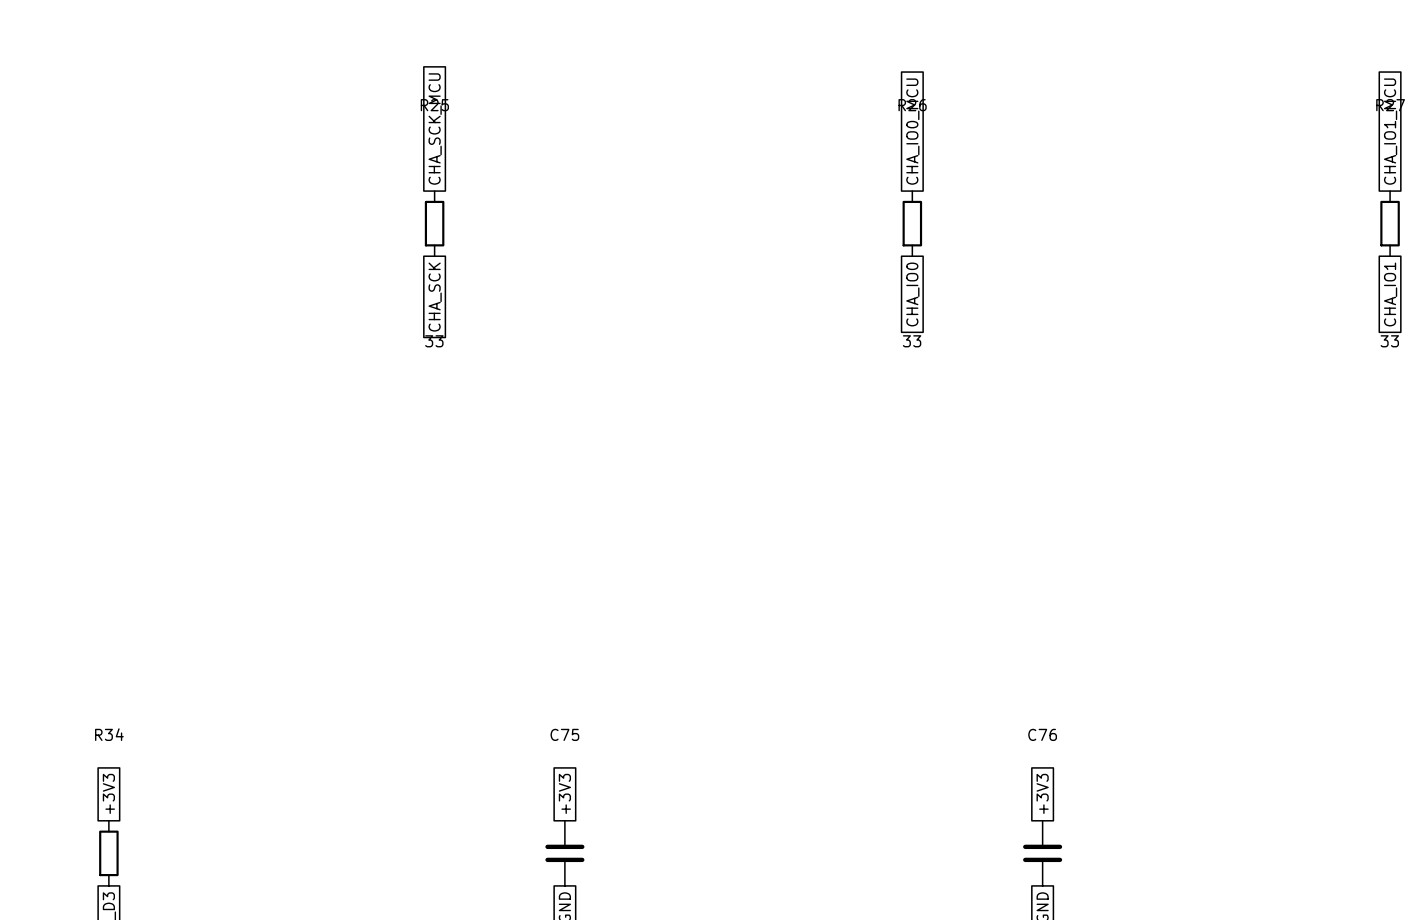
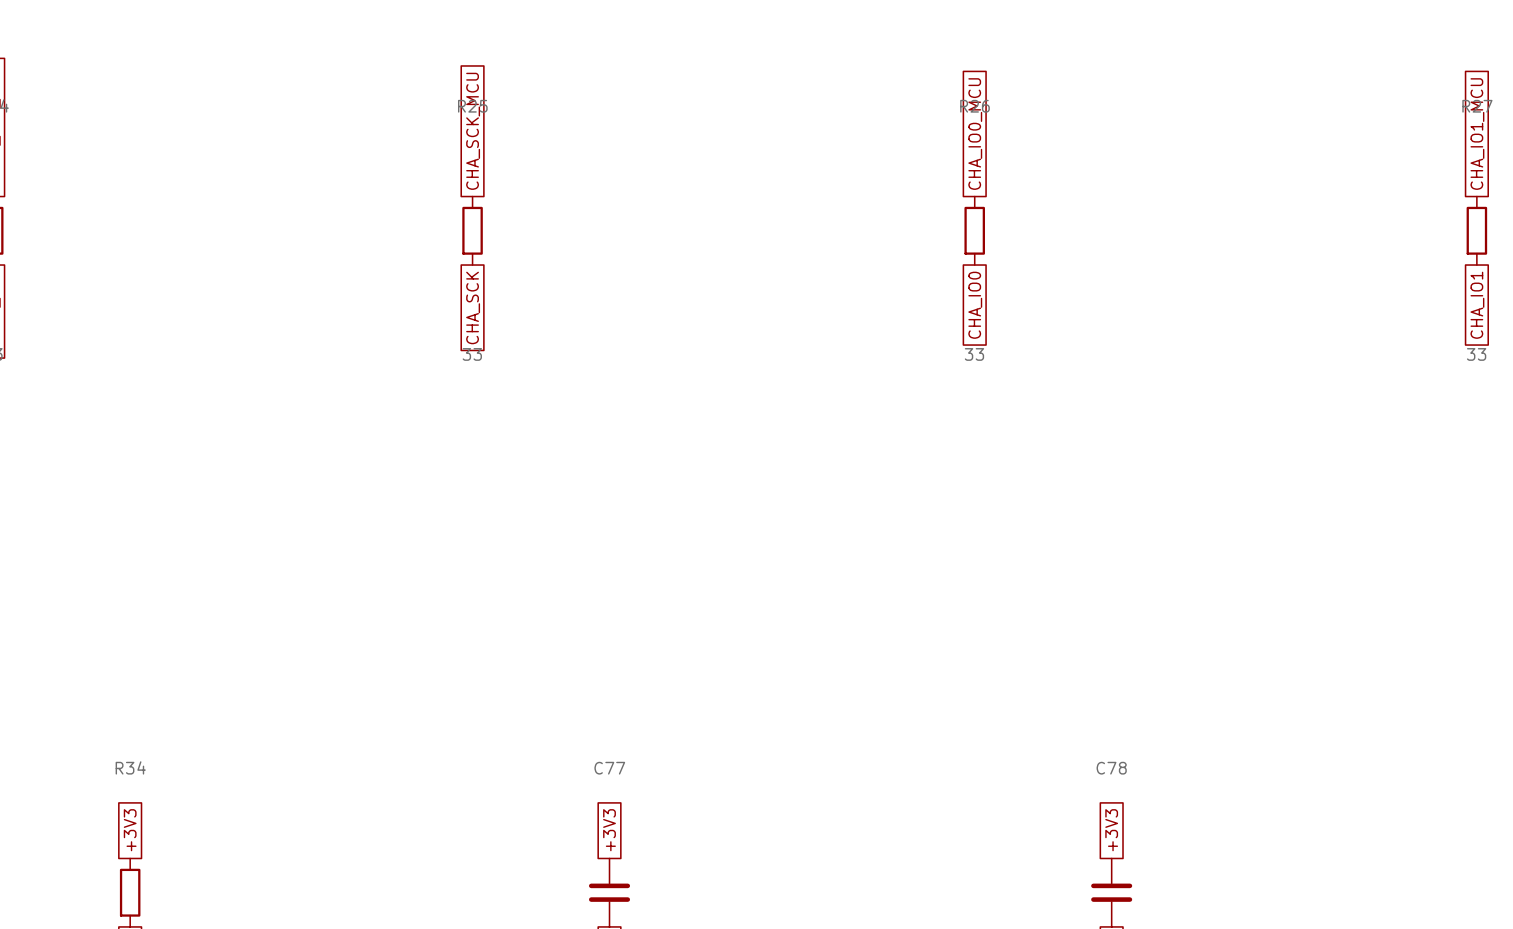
C75 name: C75 (564, 734) -> C77 (609, 768)
C76 name: C76 (1042, 734) -> C78 (1111, 768)

